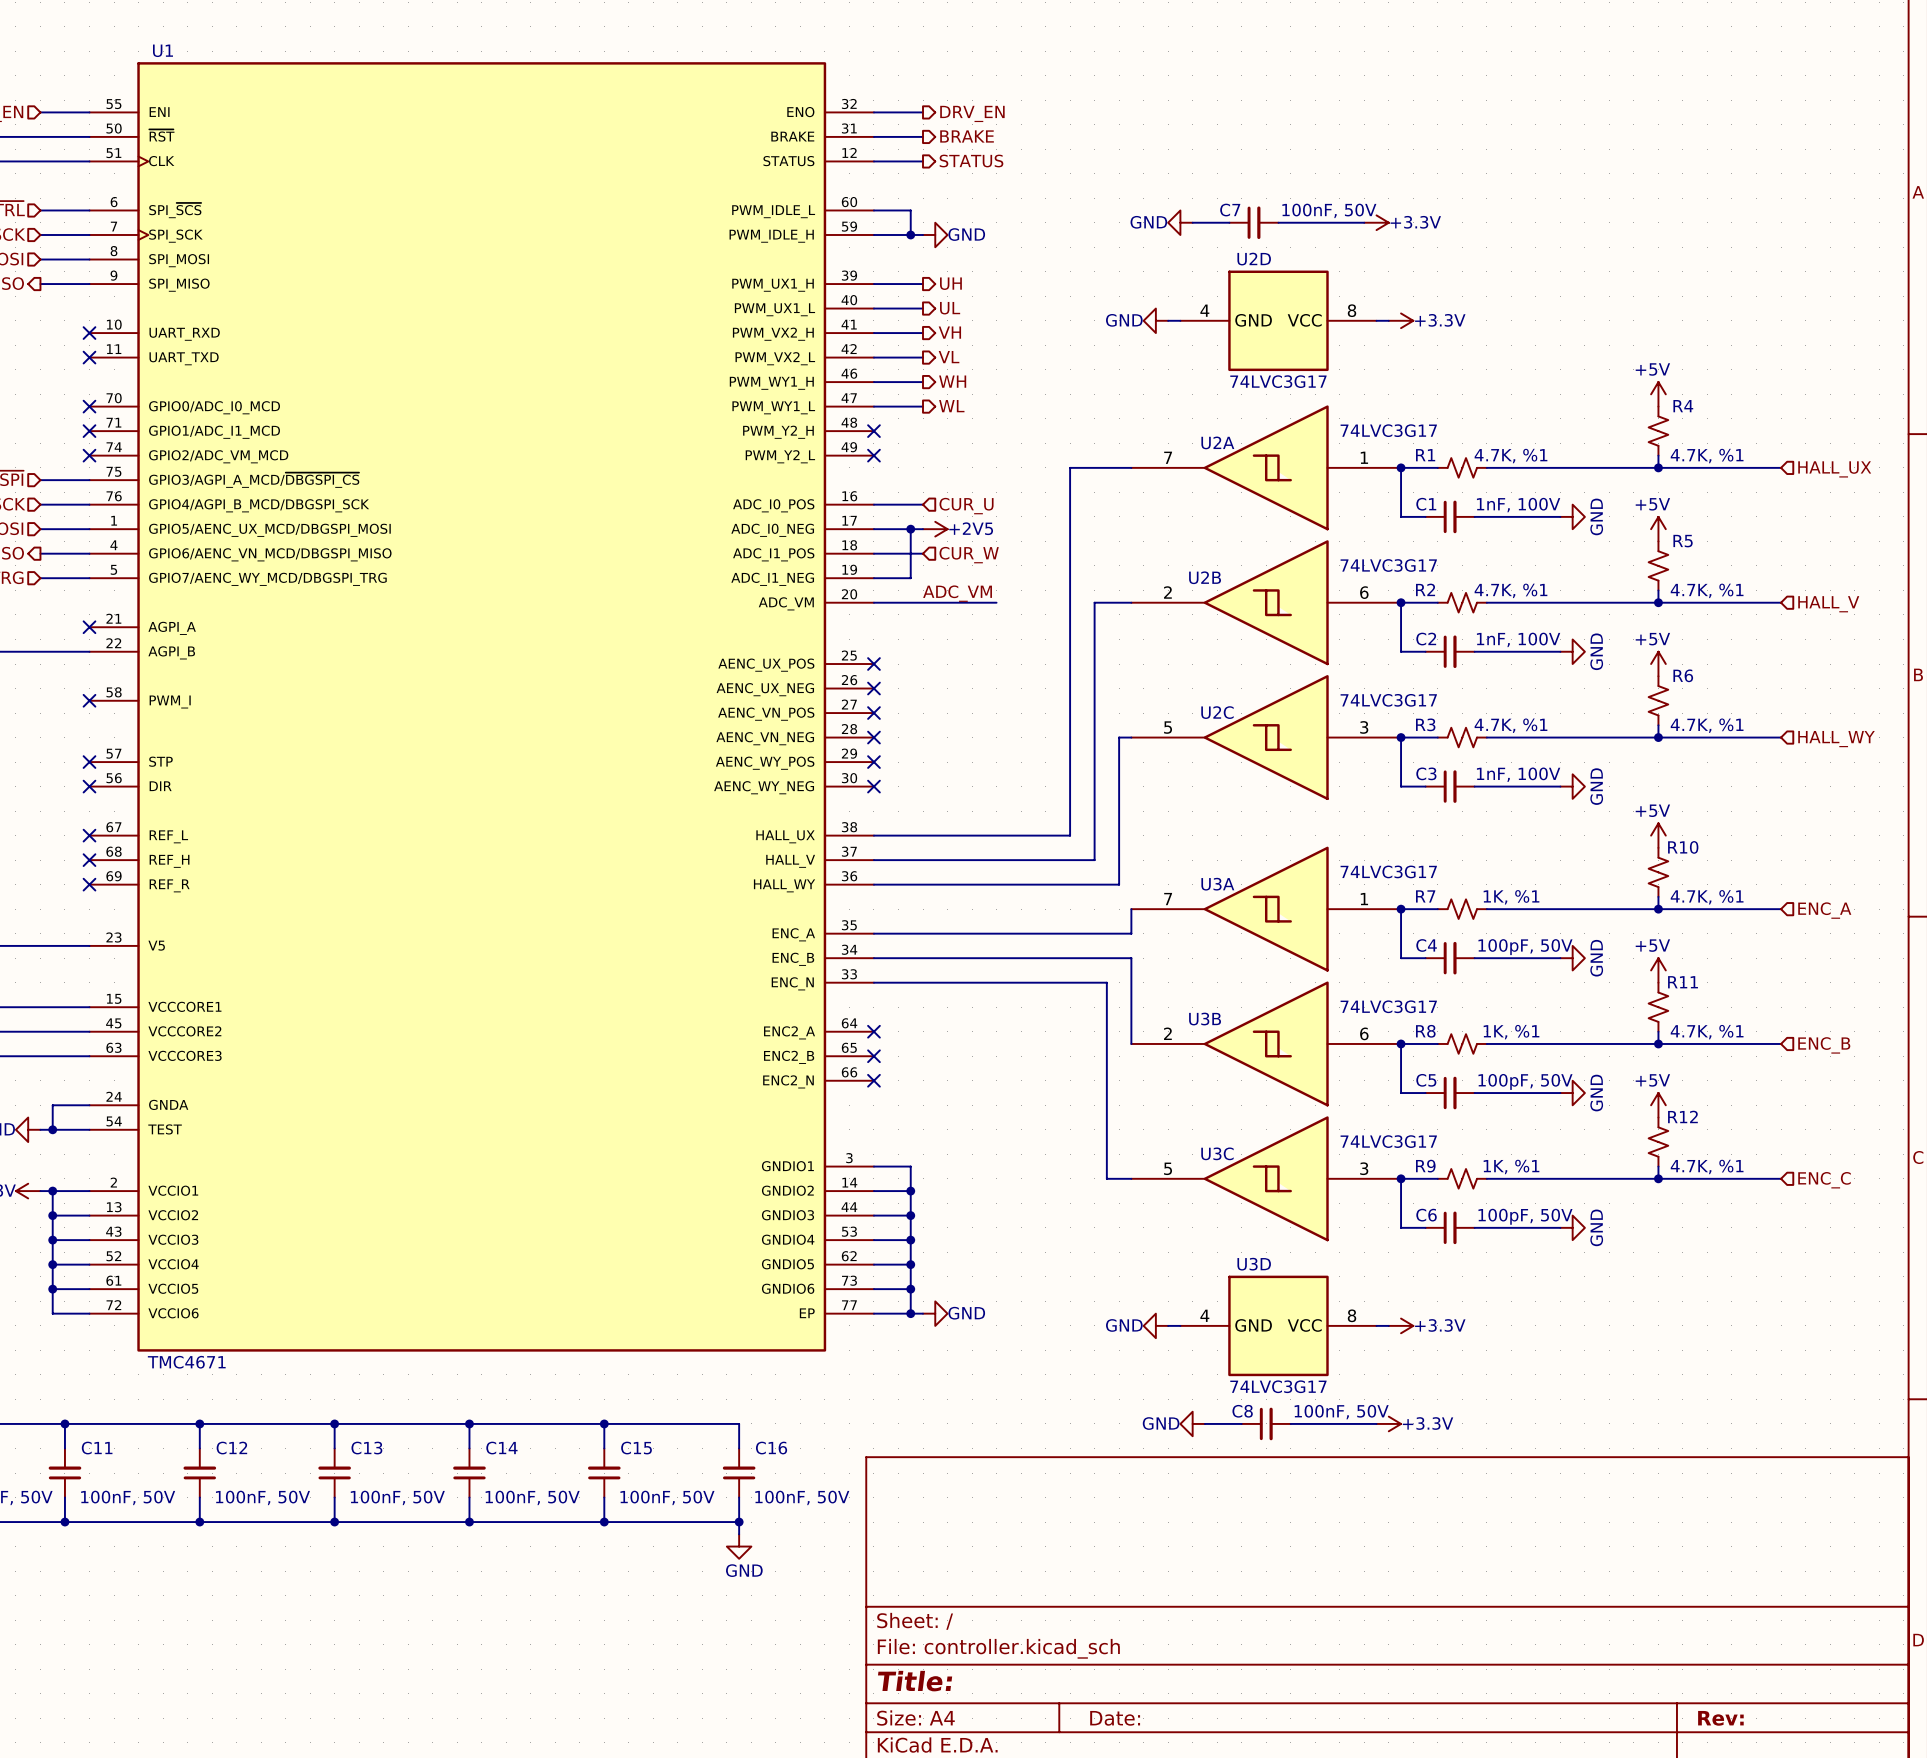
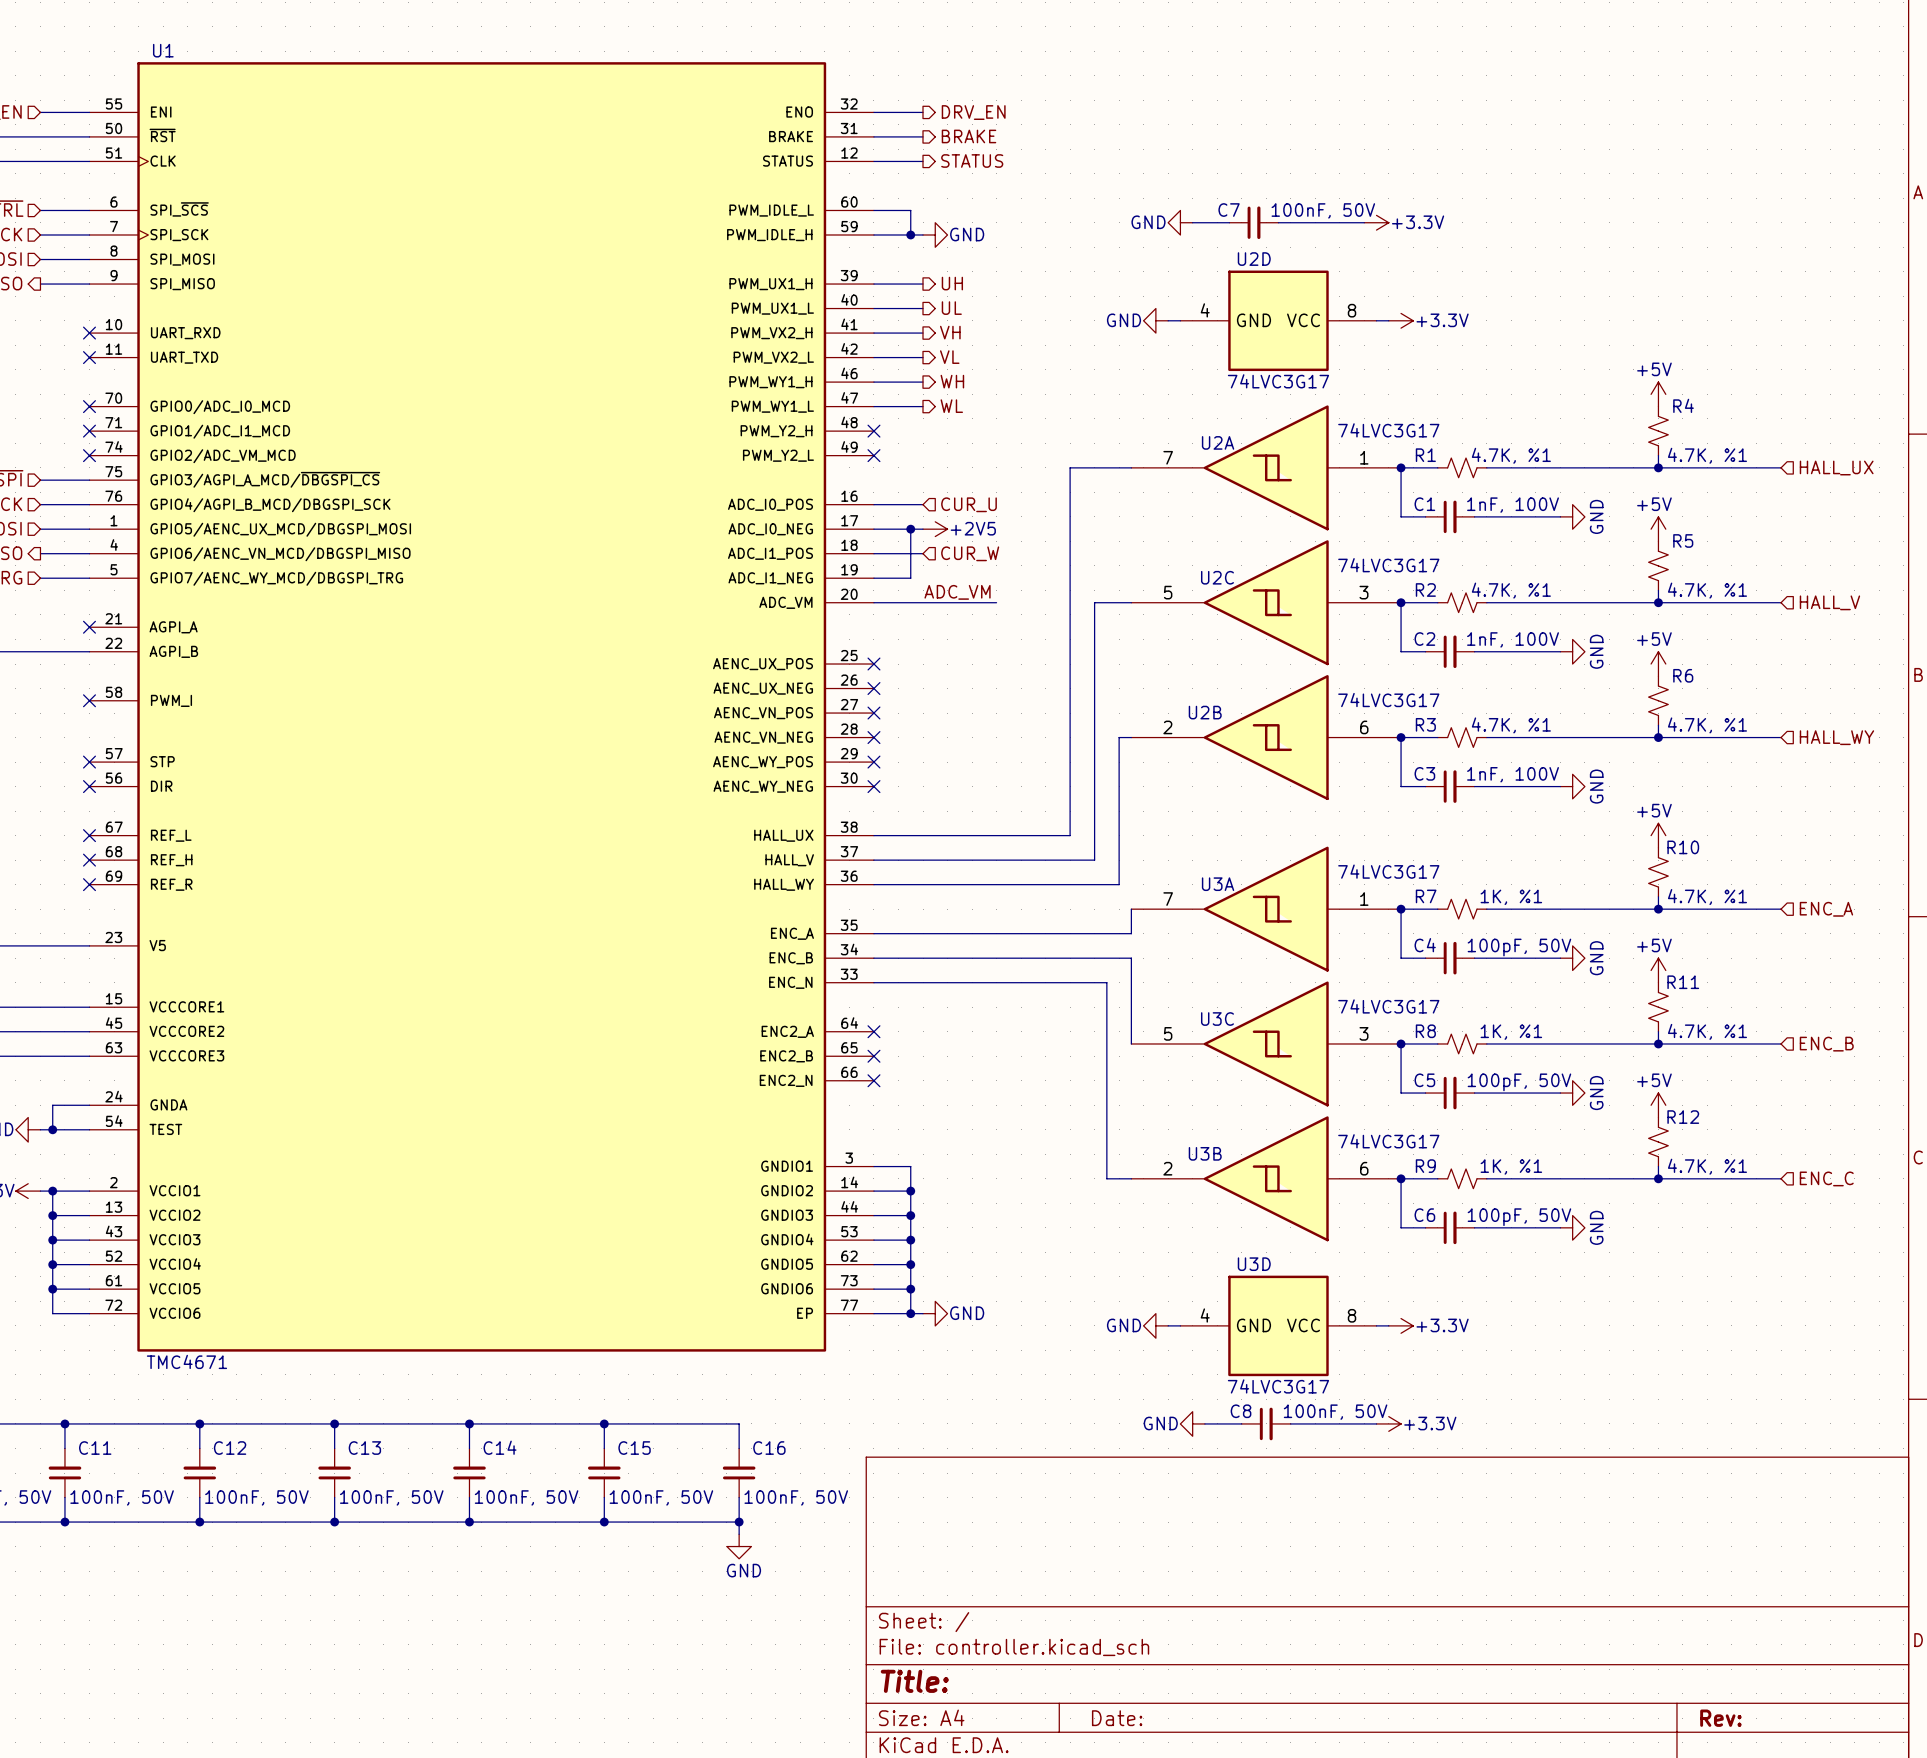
U2B position: (1266, 602) -> (1266, 737)
U2C position: (1266, 737) -> (1266, 602)
U3B position: (1266, 1043) -> (1266, 1178)
U3C position: (1266, 1178) -> (1266, 1043)

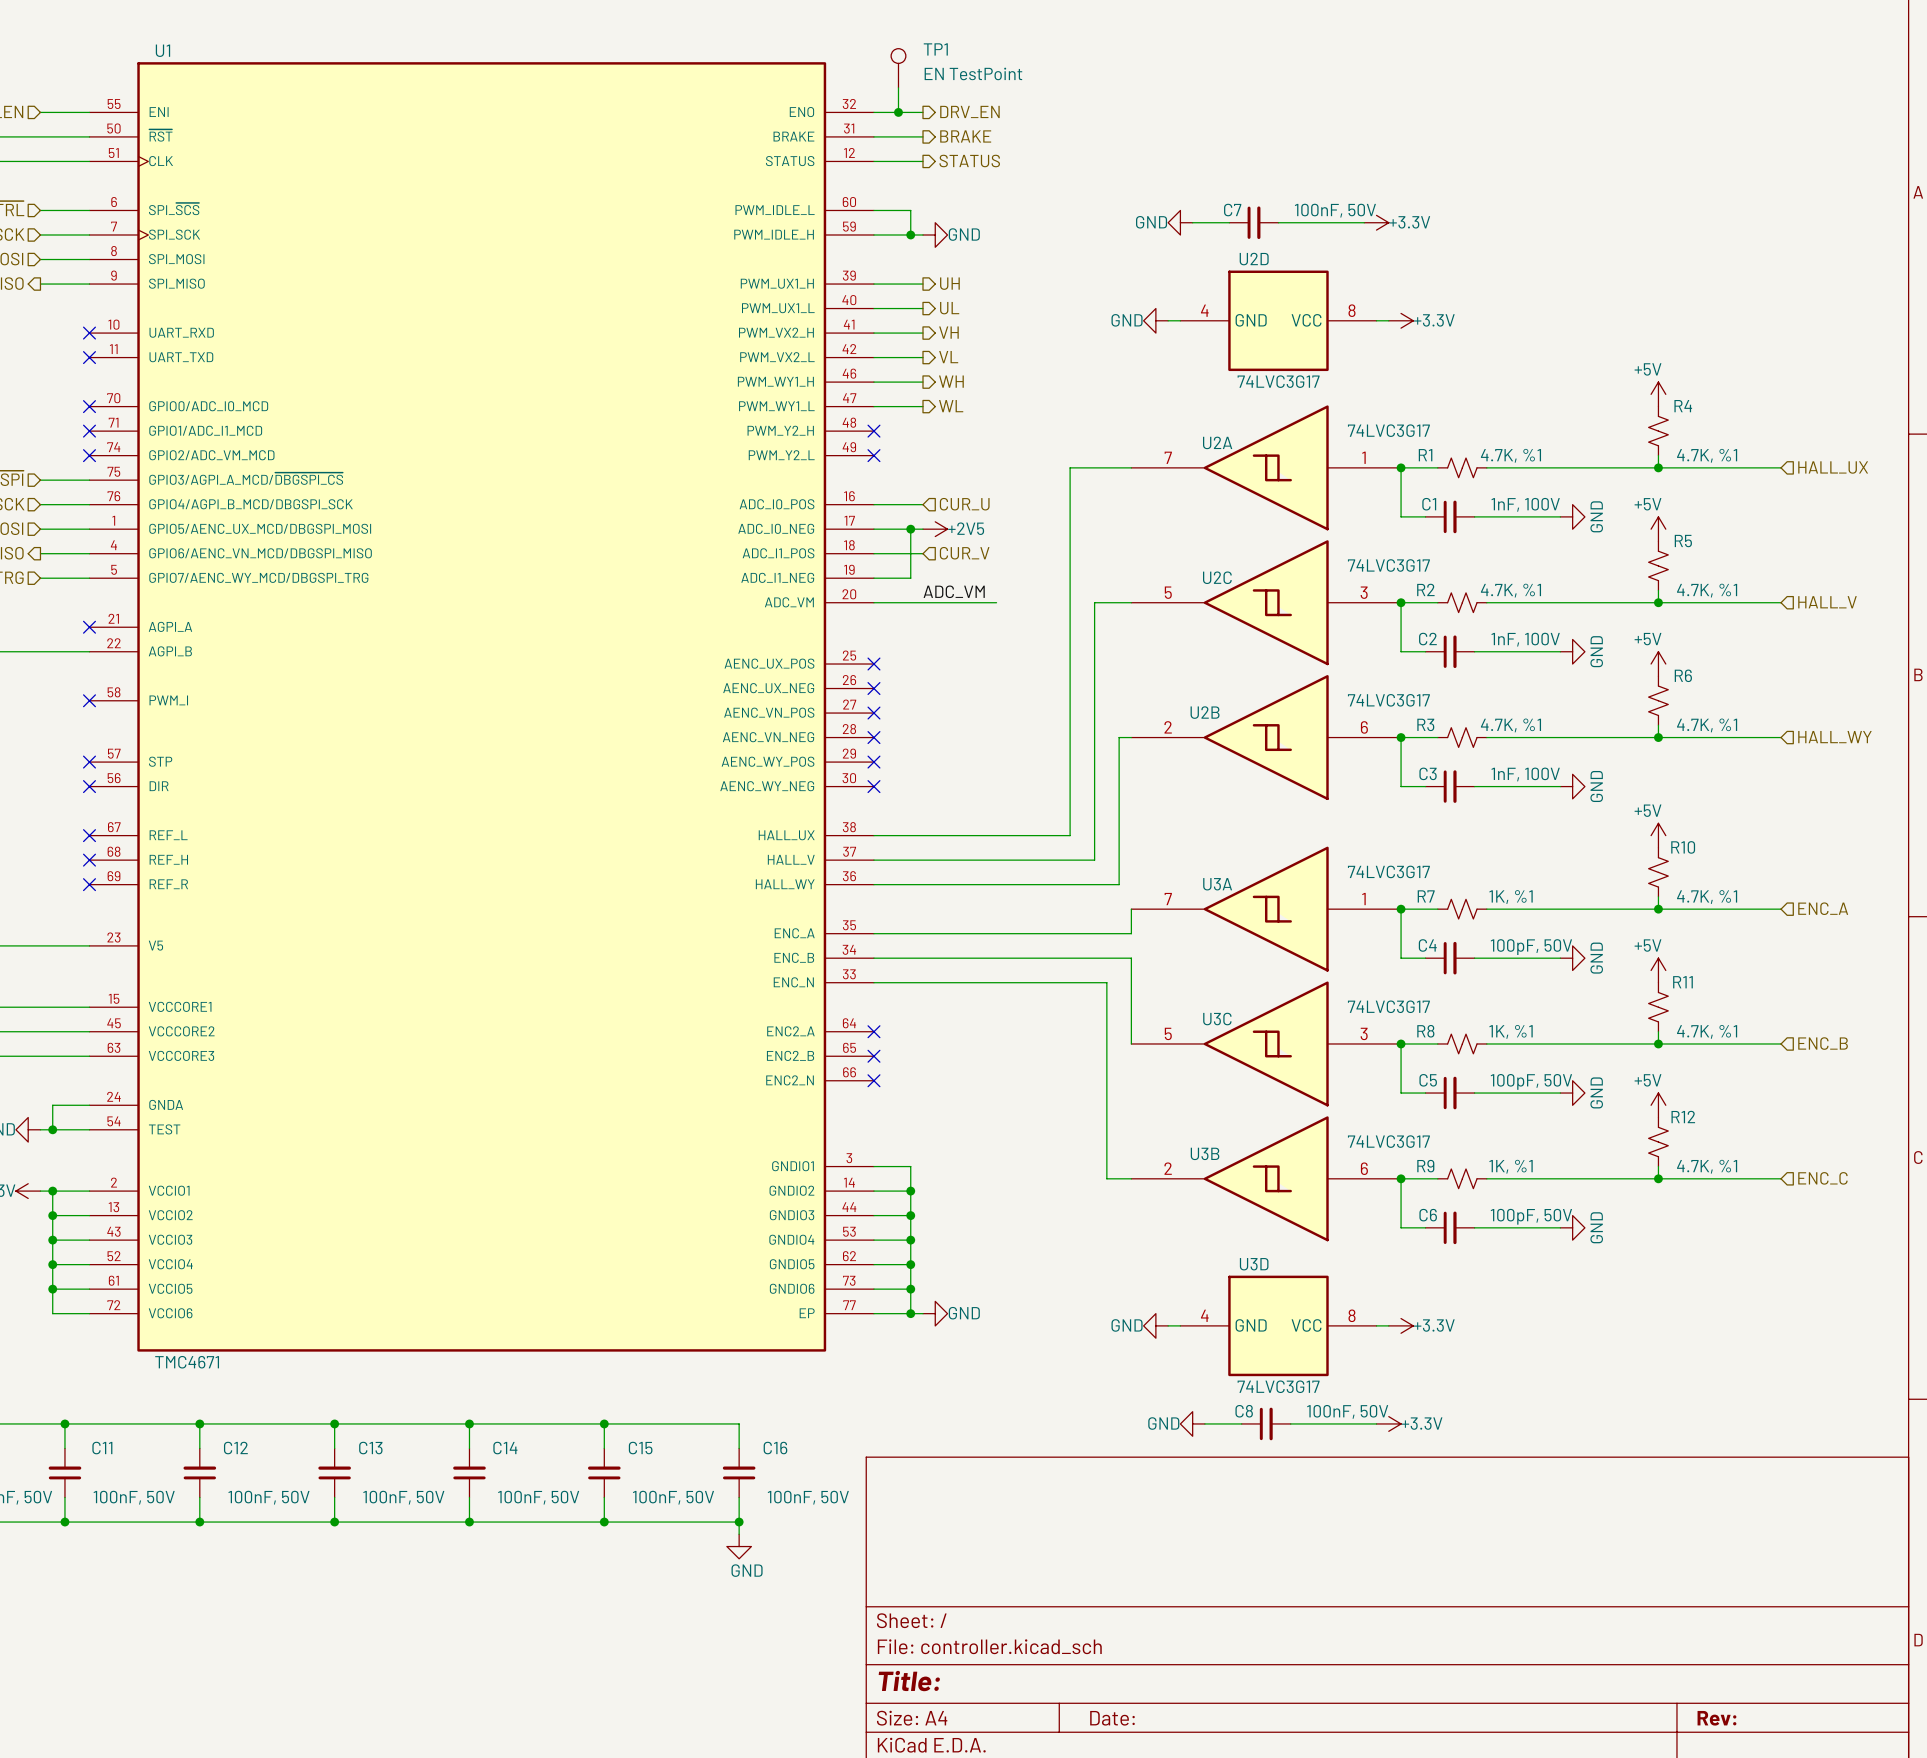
TP1: none -> EN TestPoint (898, 68)
wire: none -> (898, 87) (898, 112)
junction: none -> (898, 112)
hierarchical label: CUR_W (970, 553) -> CUR_V (964, 553)

